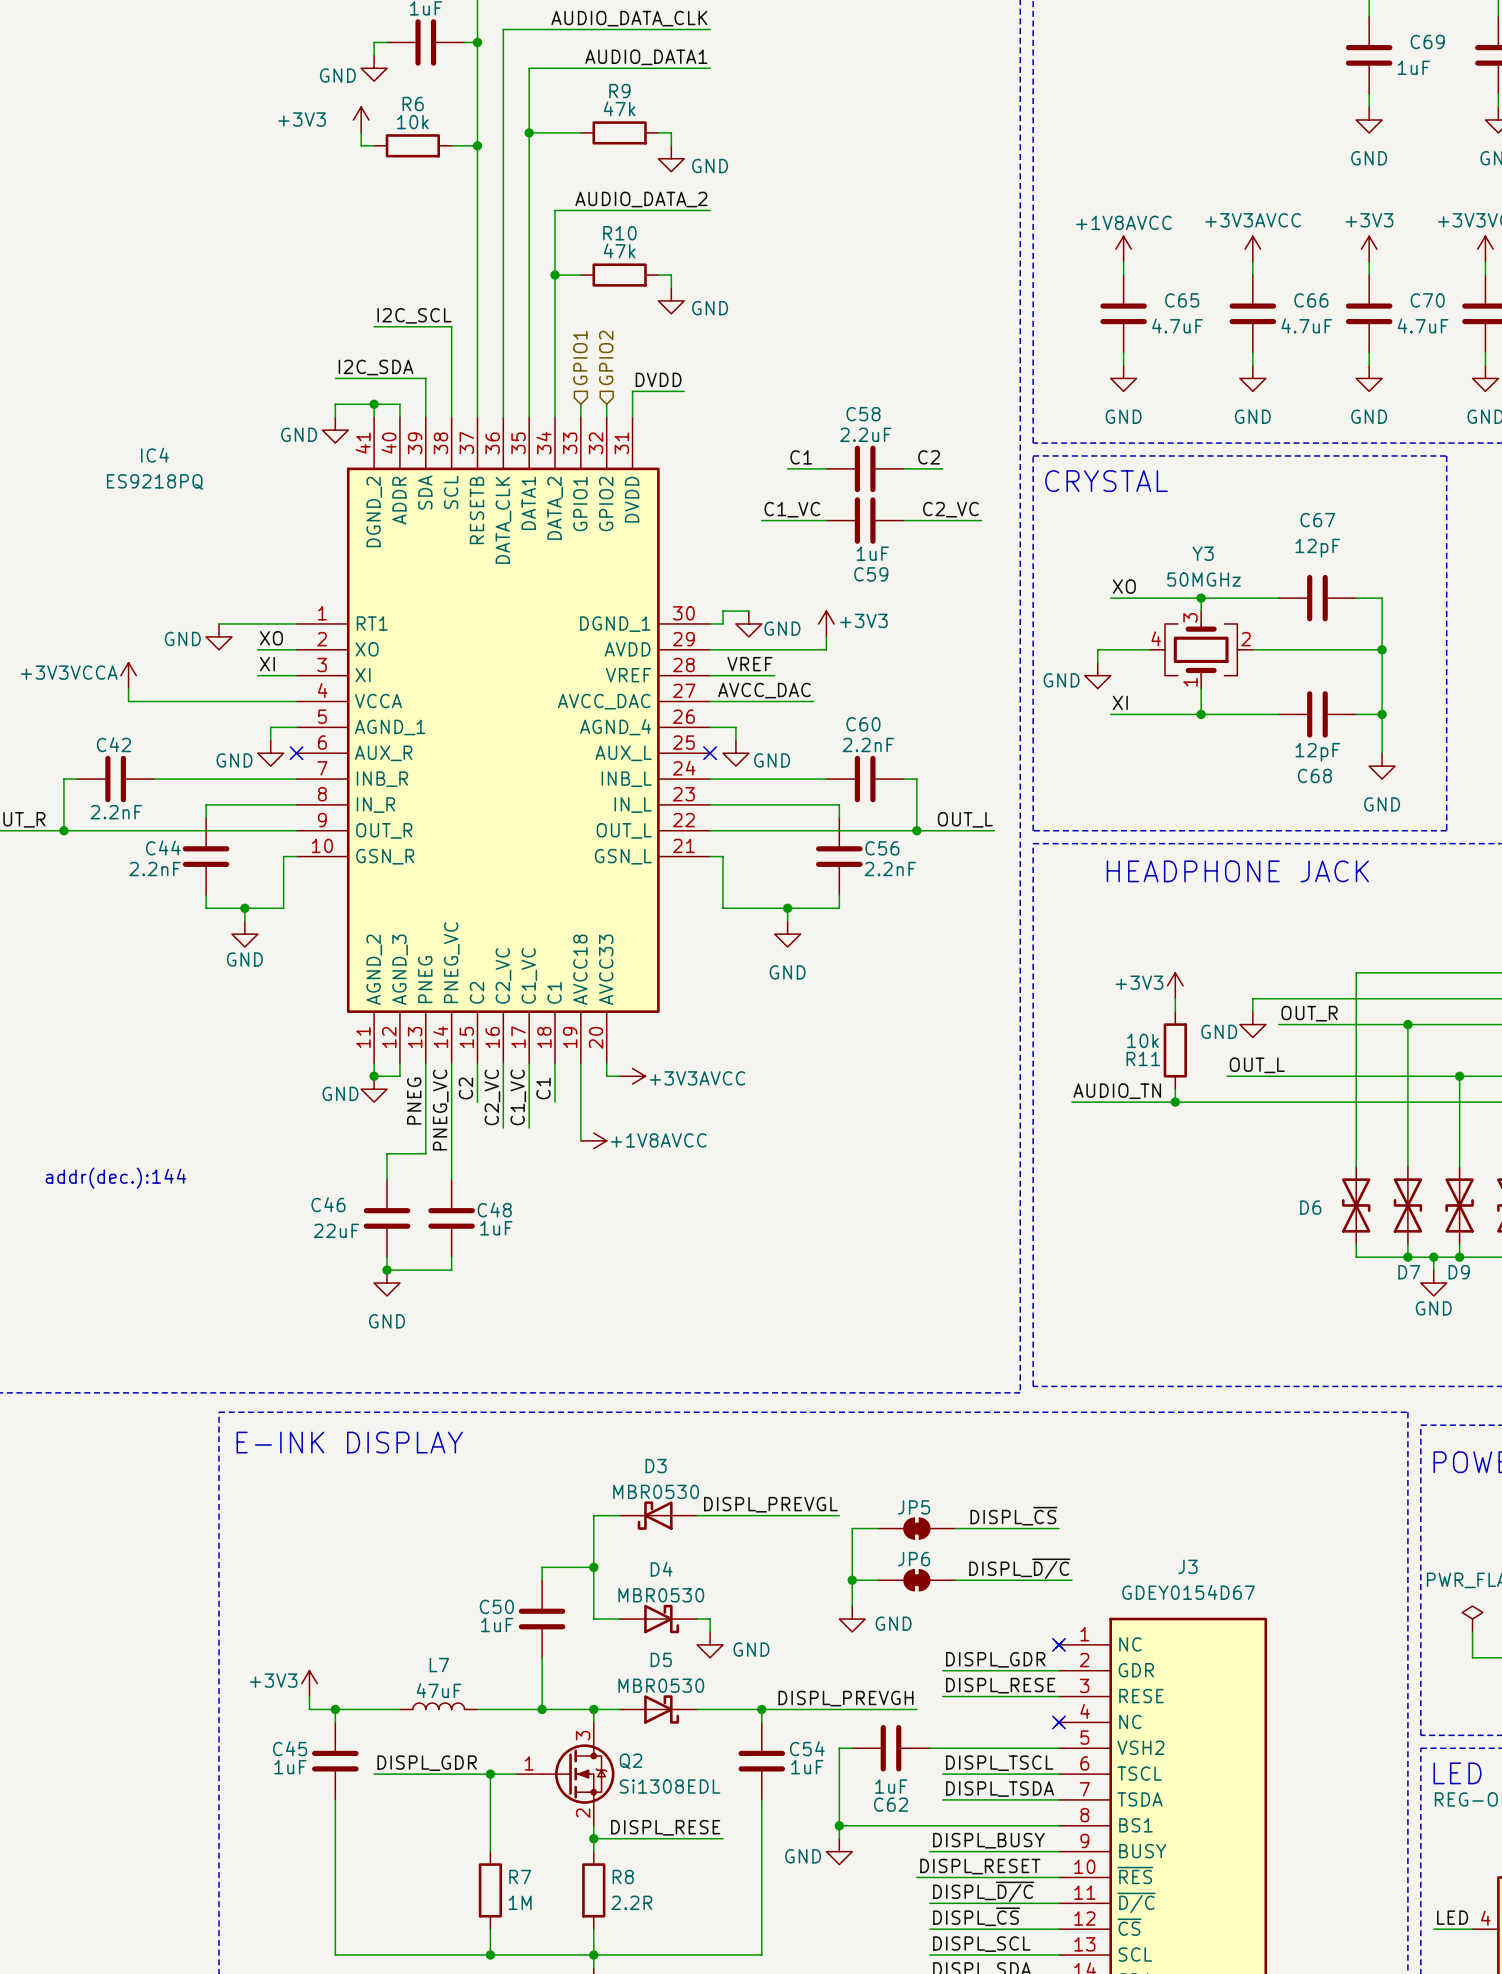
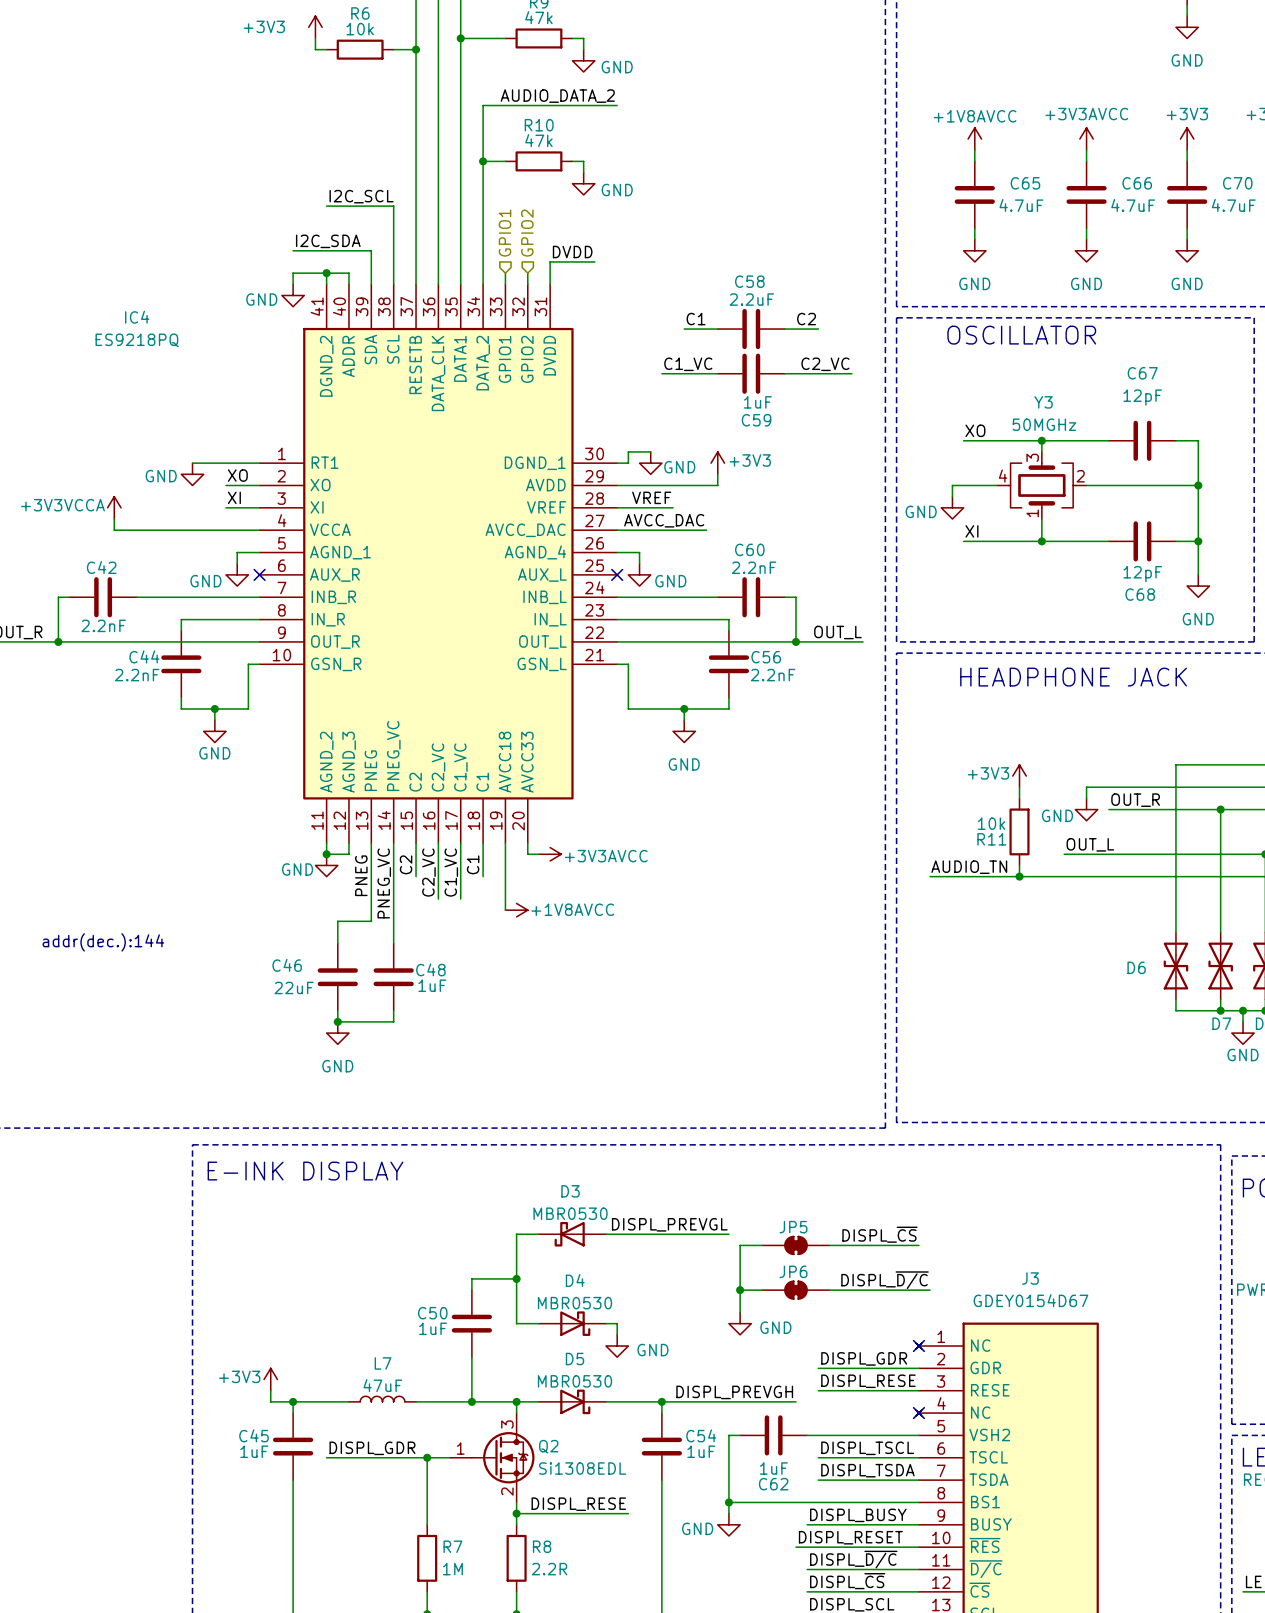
text: none -> OSCILLATOR (1021, 335)
text: CRYSTAL (1106, 481) -> none

